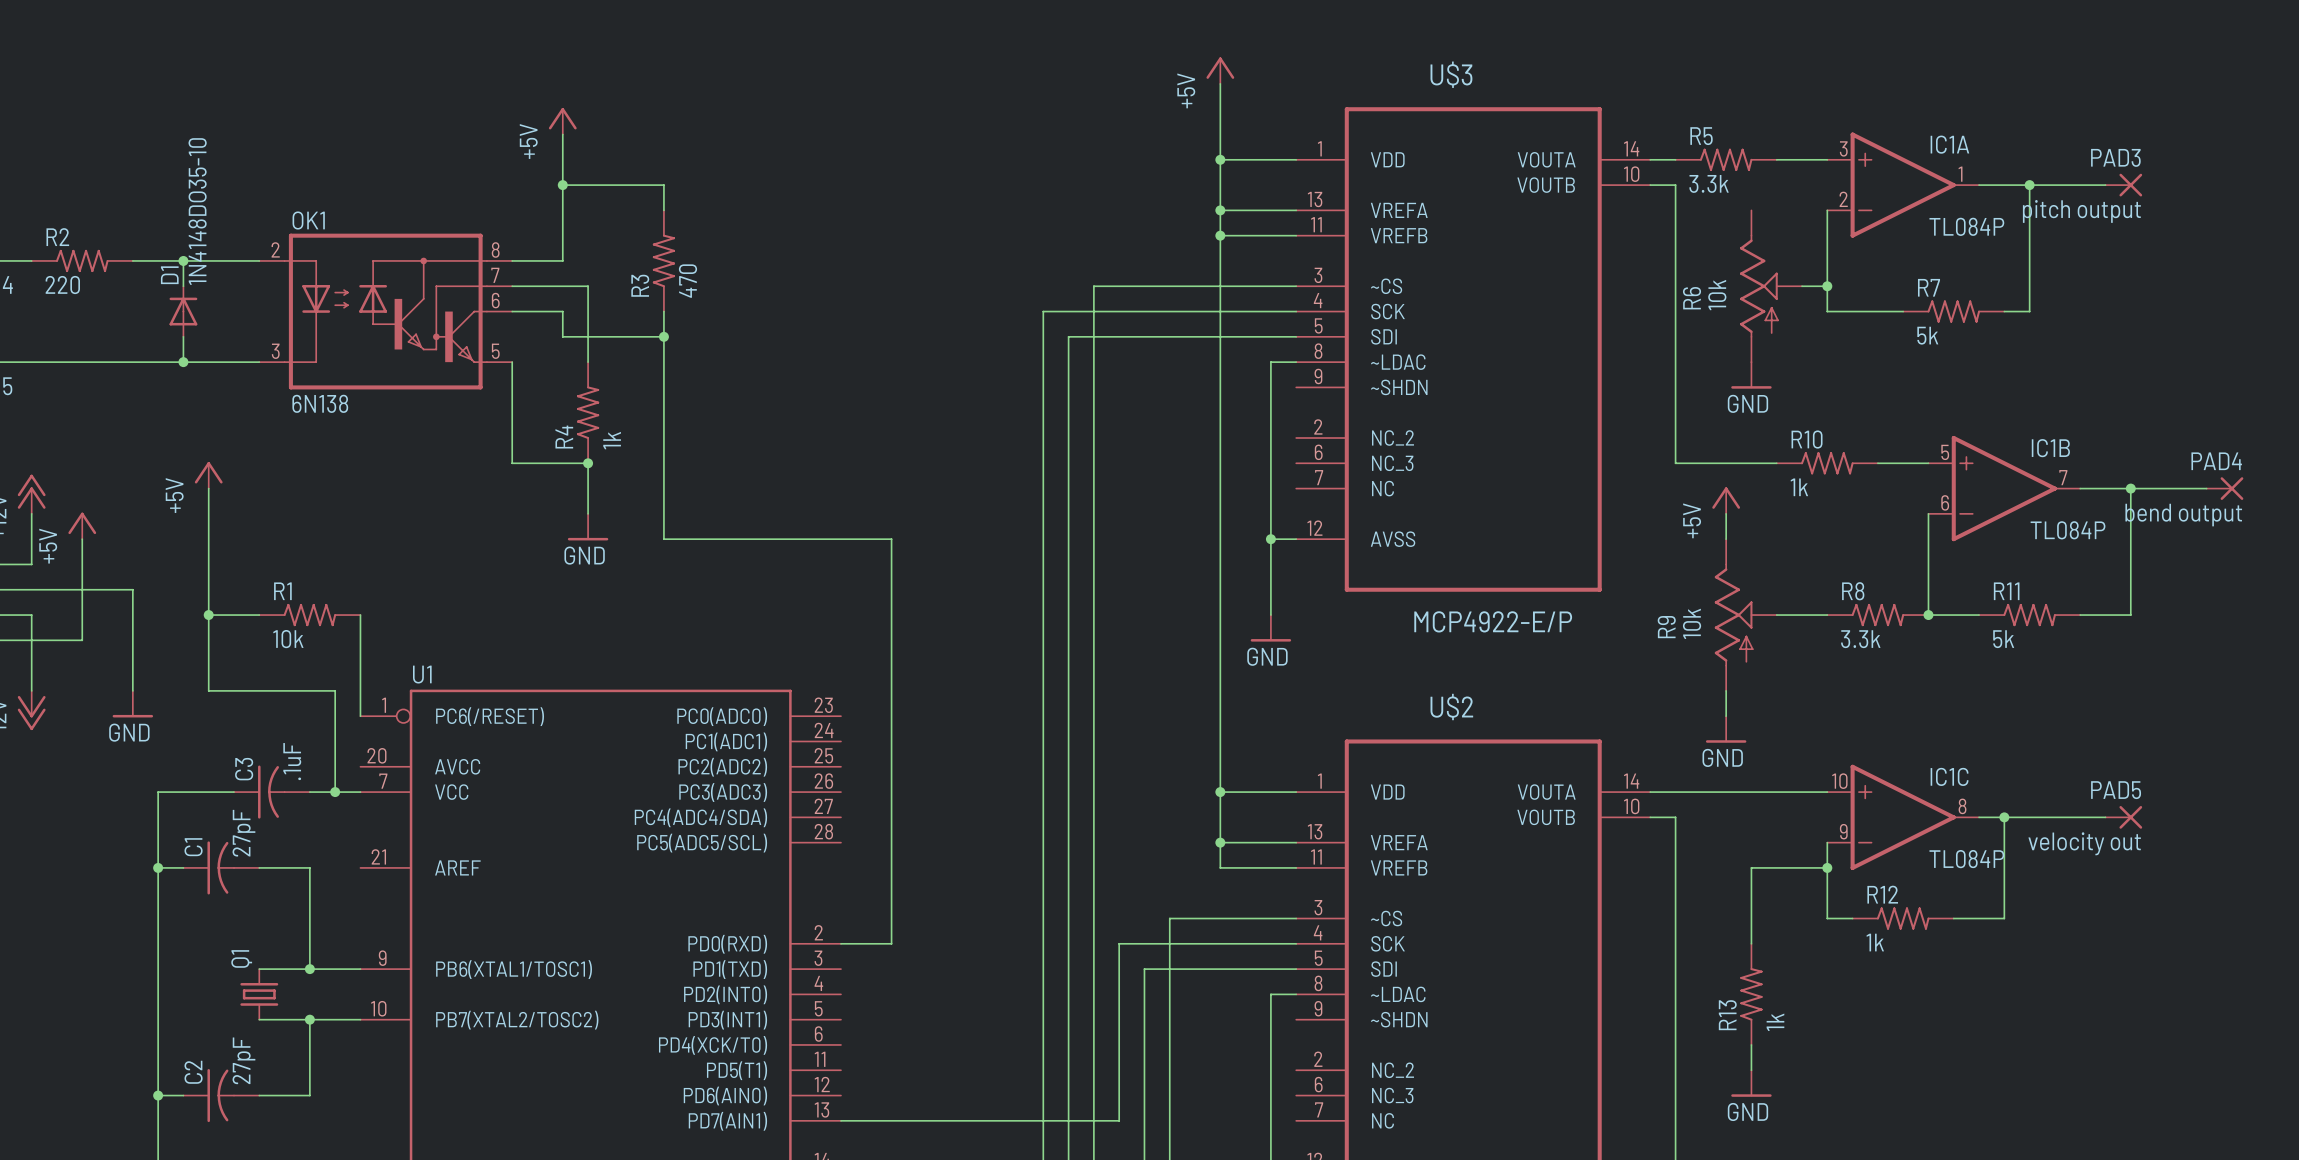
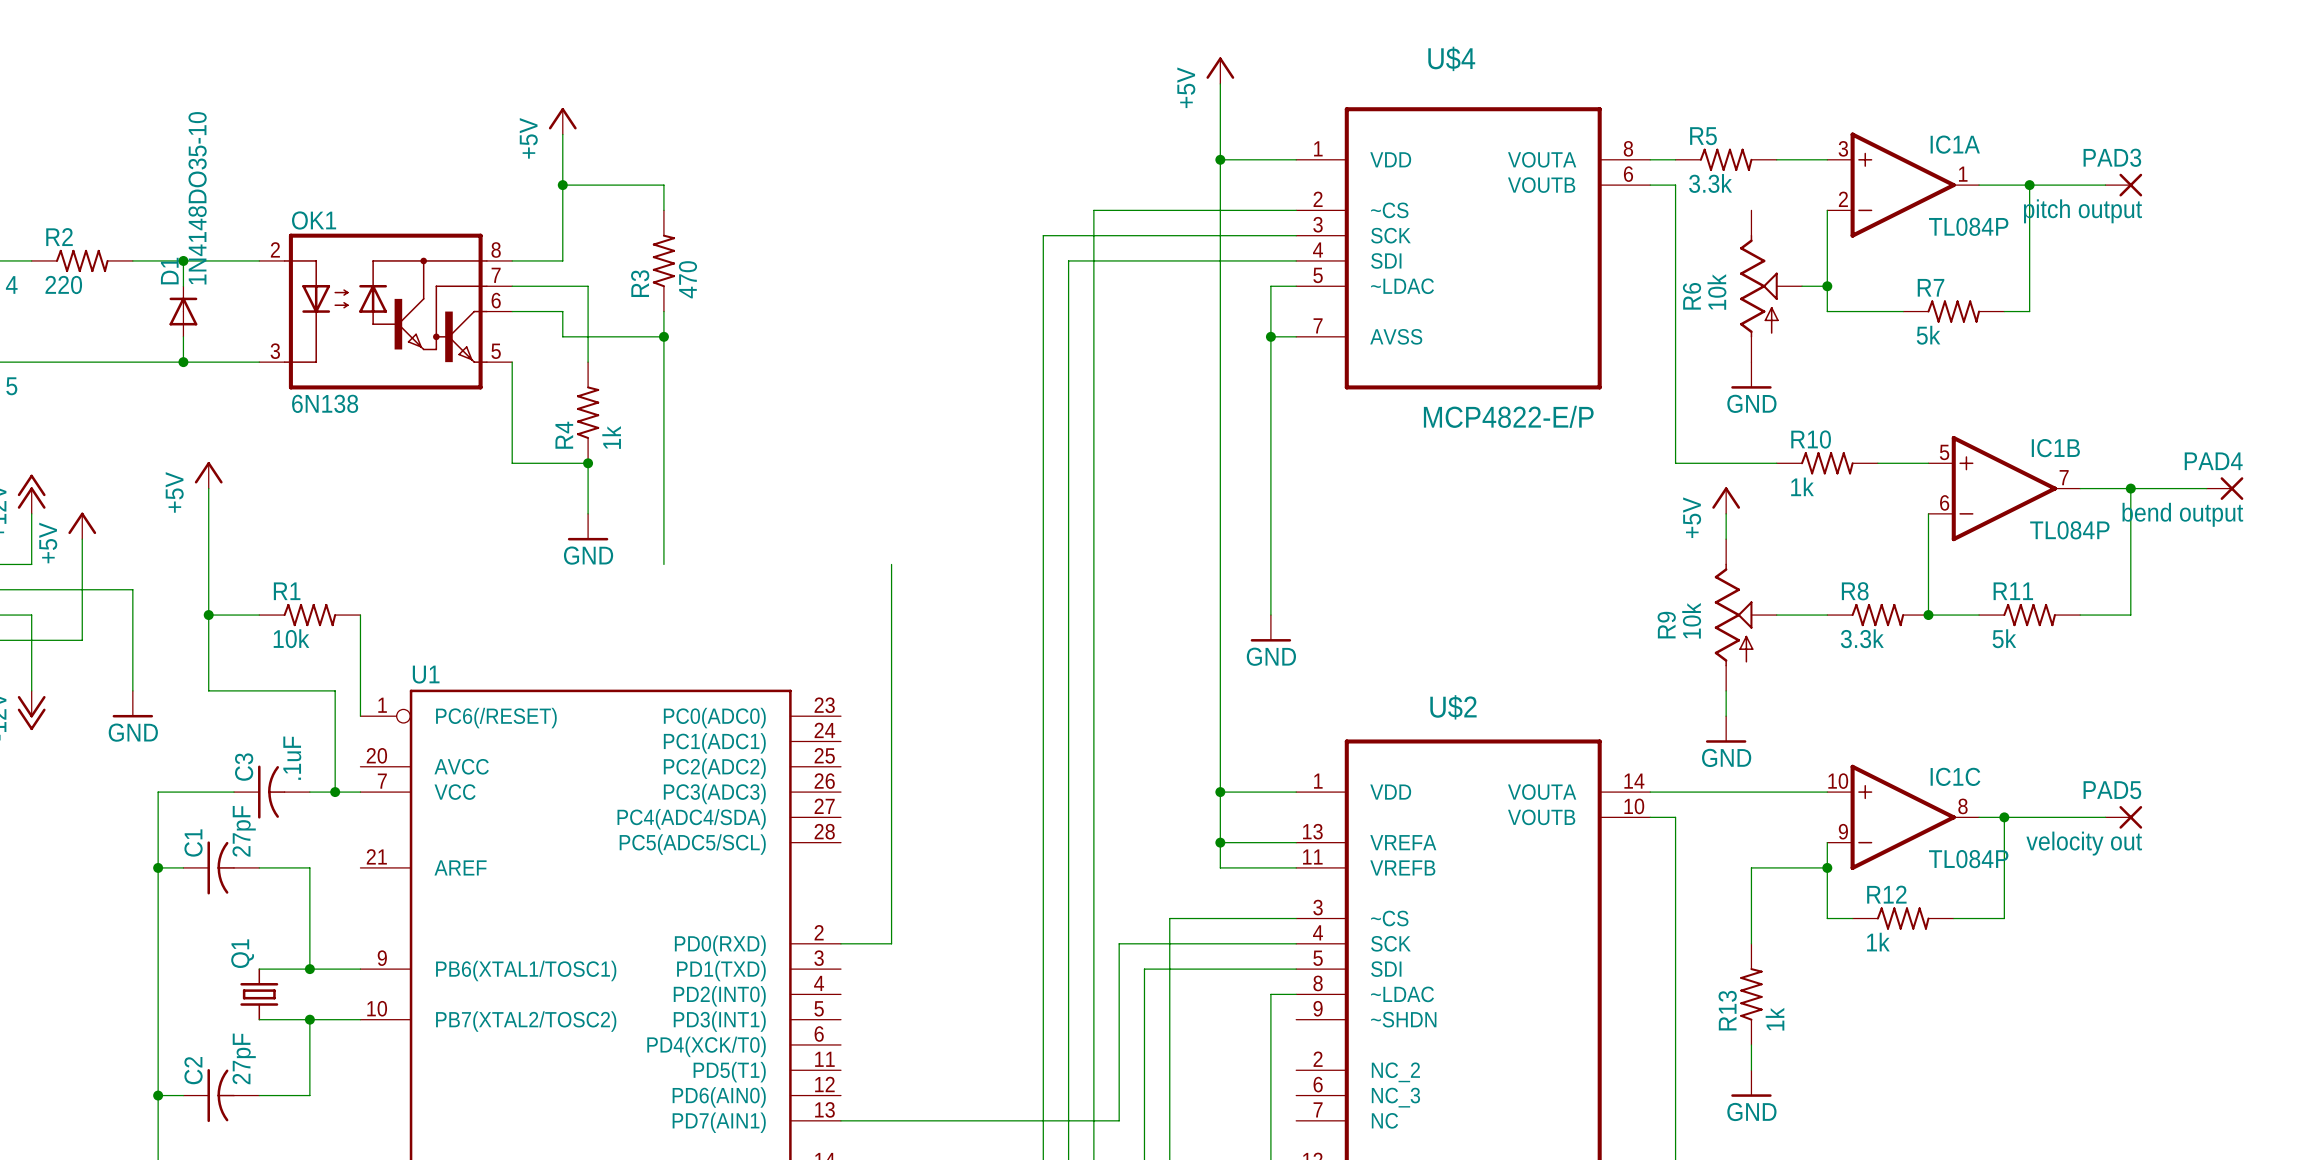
junction: (1220, 210) -> none
junction: (1220, 235) -> none
U$4: none -> MCP4822-E/P (1473, 248)
wire: (1093, 286) (1270, 286) -> (1093, 286) (1093, 210) (1220, 210)
wire: (1043, 311) (1296, 311) -> (1043, 311) (1043, 235) (1220, 235)
wire: (1068, 336) (1270, 336) -> (1068, 336) (1068, 260) (1296, 260)
junction: none -> (1270, 336)
U$3: MCP4922-E/P (1473, 349) -> none
wire: (1270, 362) (1296, 362) -> (1270, 362) (1270, 286)
wire: (663, 539) (891, 539) (891, 564) -> (663, 539) (663, 564)
wire: (1270, 539) (1296, 539) -> none
junction: (1270, 539) -> none

